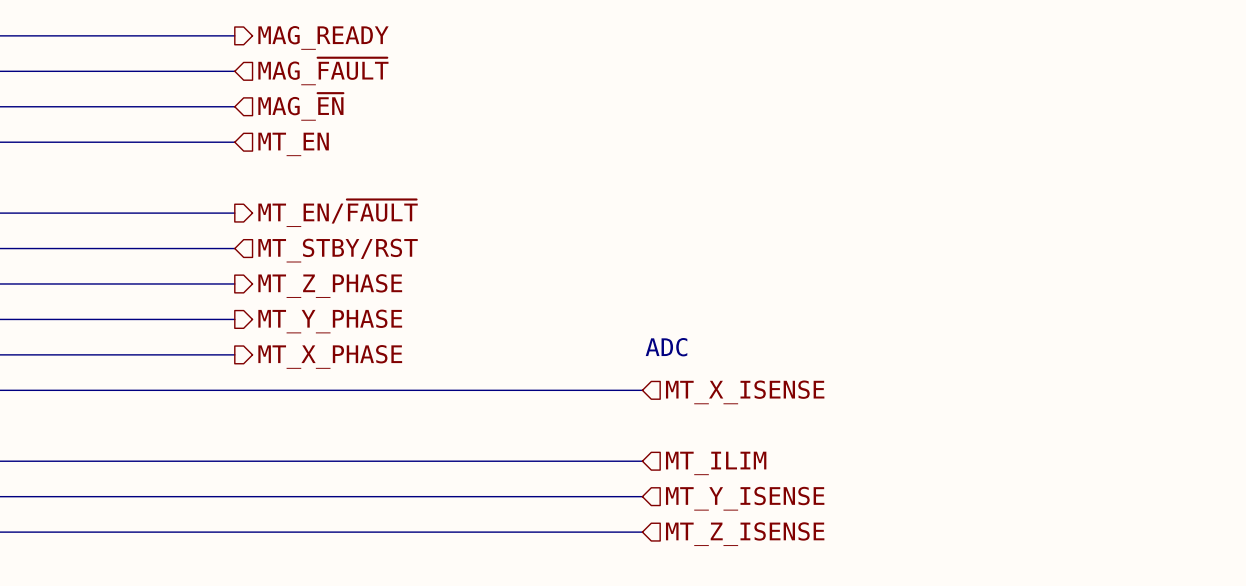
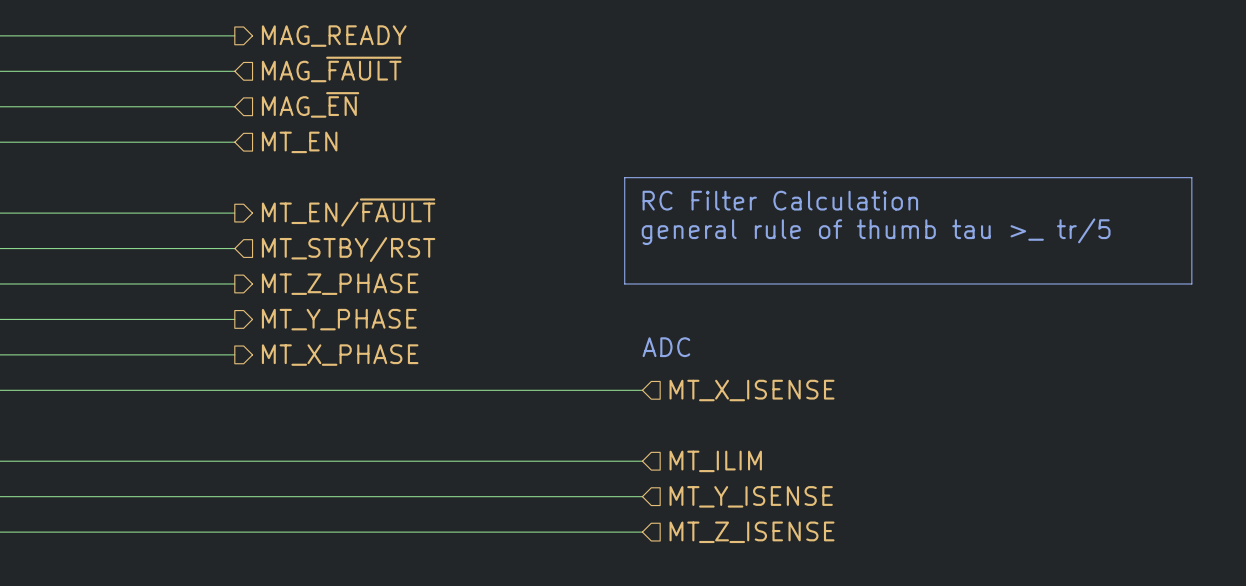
line: none -> (624, 177) (1191, 177) (1191, 283) (624, 283) (624, 177)
text: none -> RC Filter Calculation (780, 200)
text: none -> general rule of thumb tau >_ tr/5 (876, 231)

